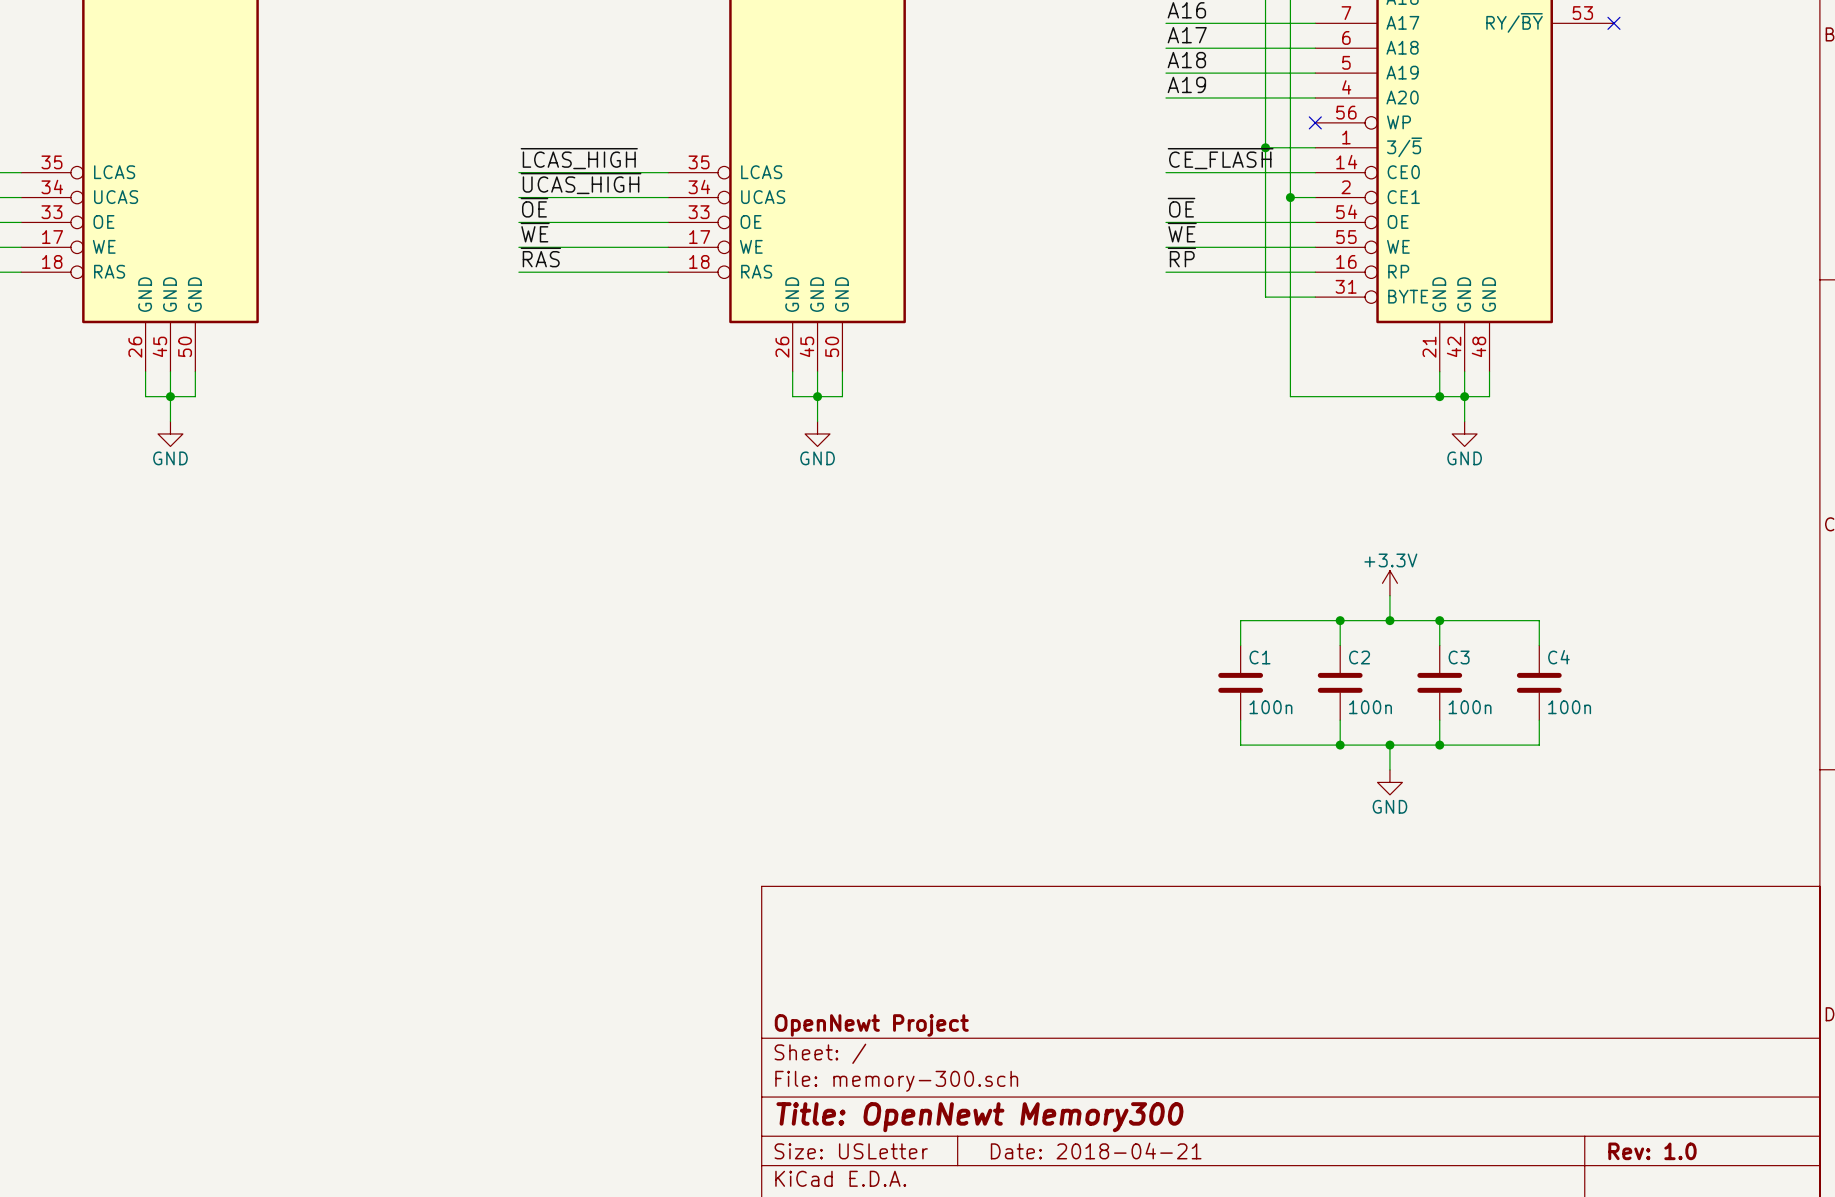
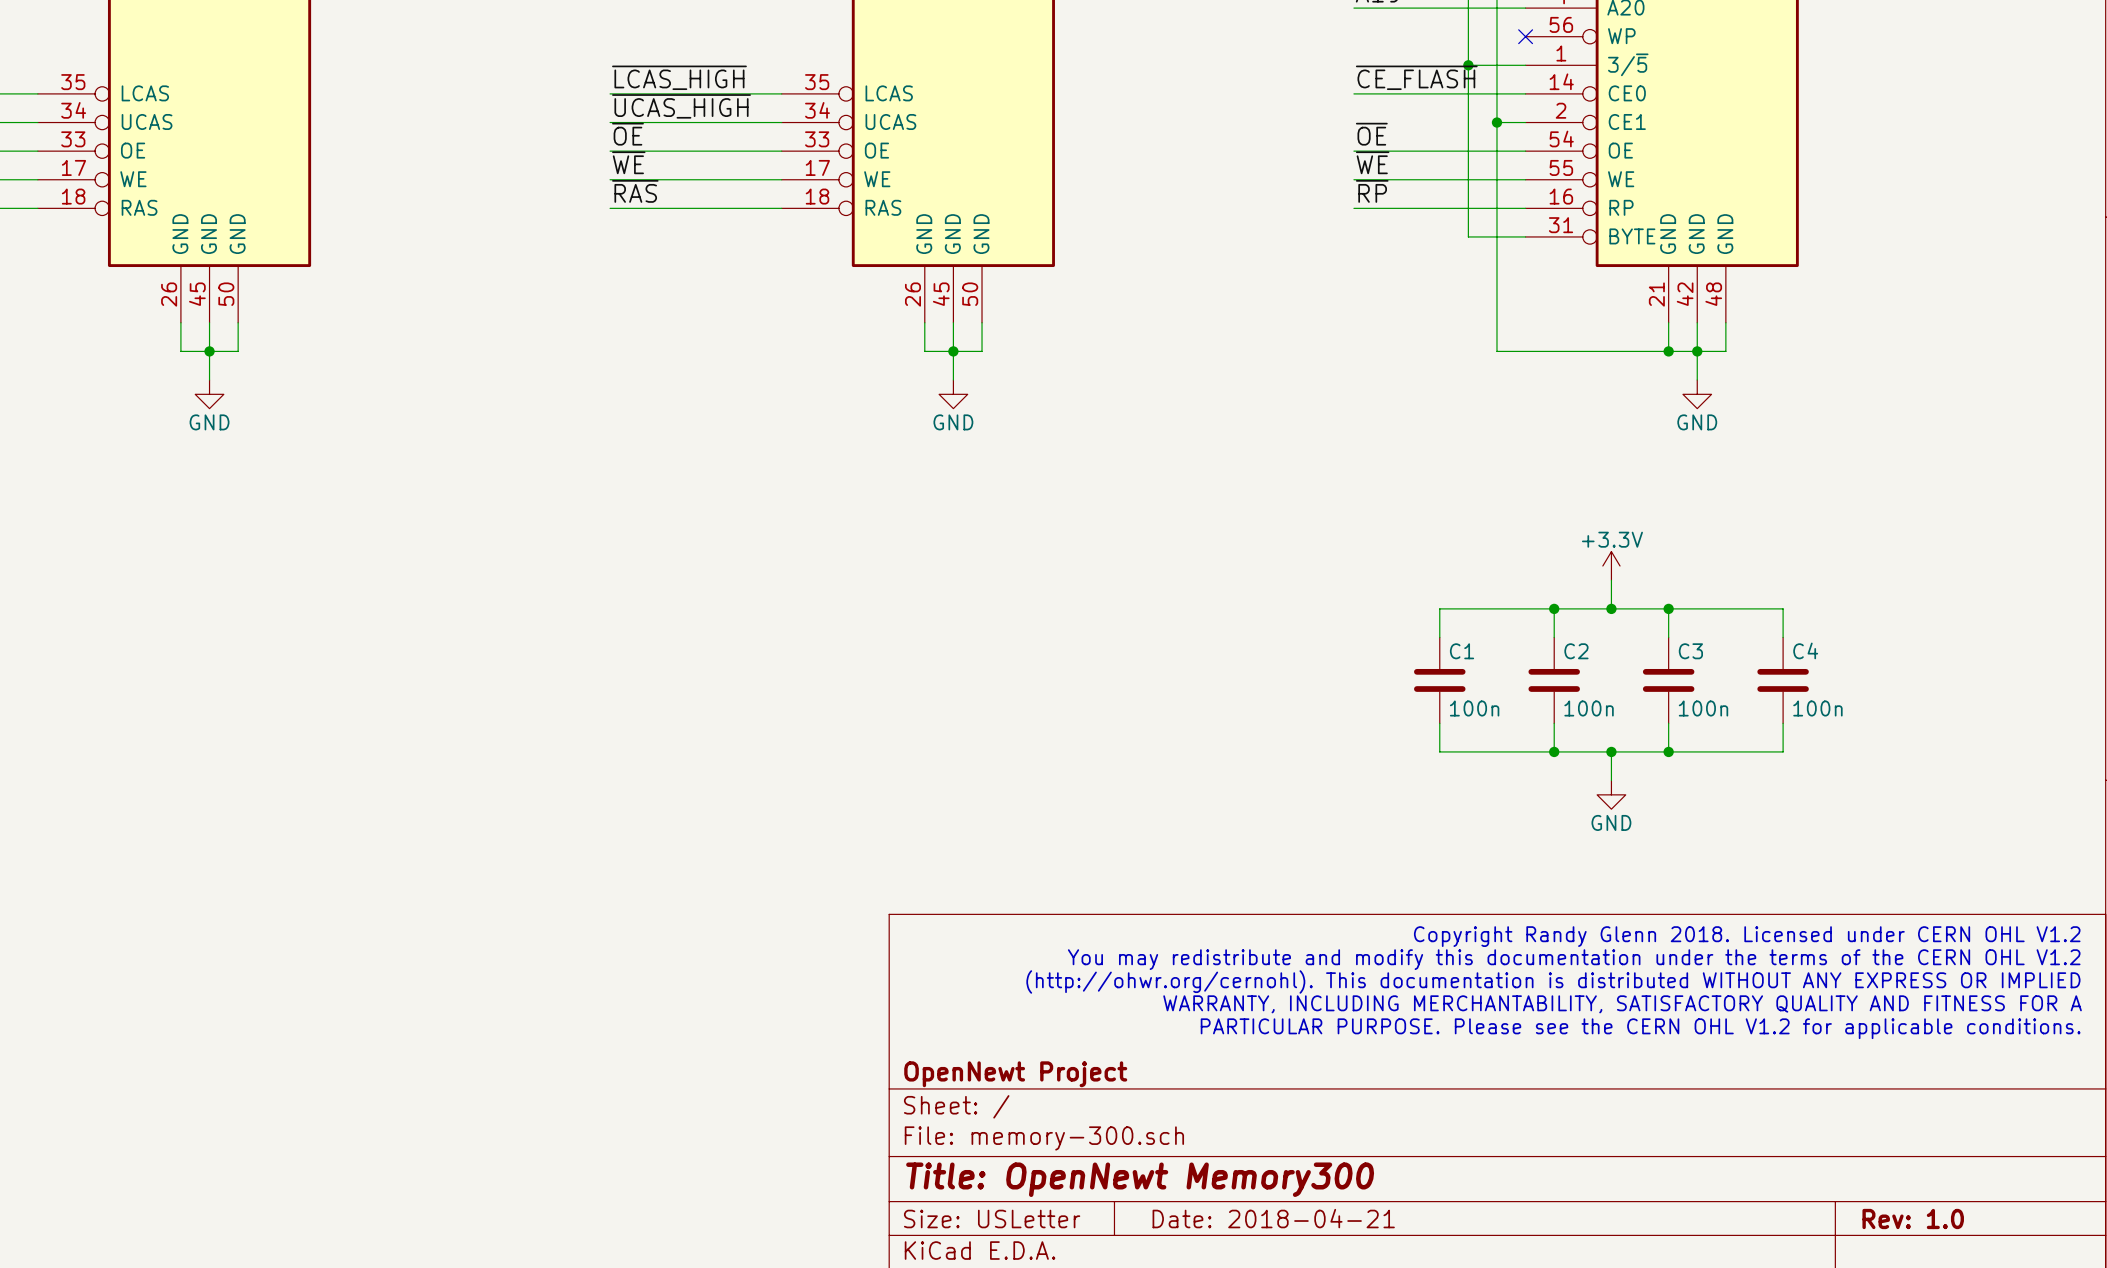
text: none -> Copyright Randy Glenn 2018. Licensed under CERN OHL V1.2 (1747, 936)
text: none -> You may redistribute and modify this documentation under the terms of the CERN OHL V1.2 (1574, 959)
text: none -> (http://ohwr.org/cernohl). This documentation is distributed WITHOUT ANY EXPRESS OR IMPLIED (1553, 981)
text: none -> WARRANTY, INCLUDING MERCHANTABILITY, SATISFACTORY QUALITY AND FITNESS FOR A (1622, 1004)
text: none -> PARTICULAR PURPOSE. Please see the CERN OHL V1.2 for applicable conditions. (1640, 1028)

